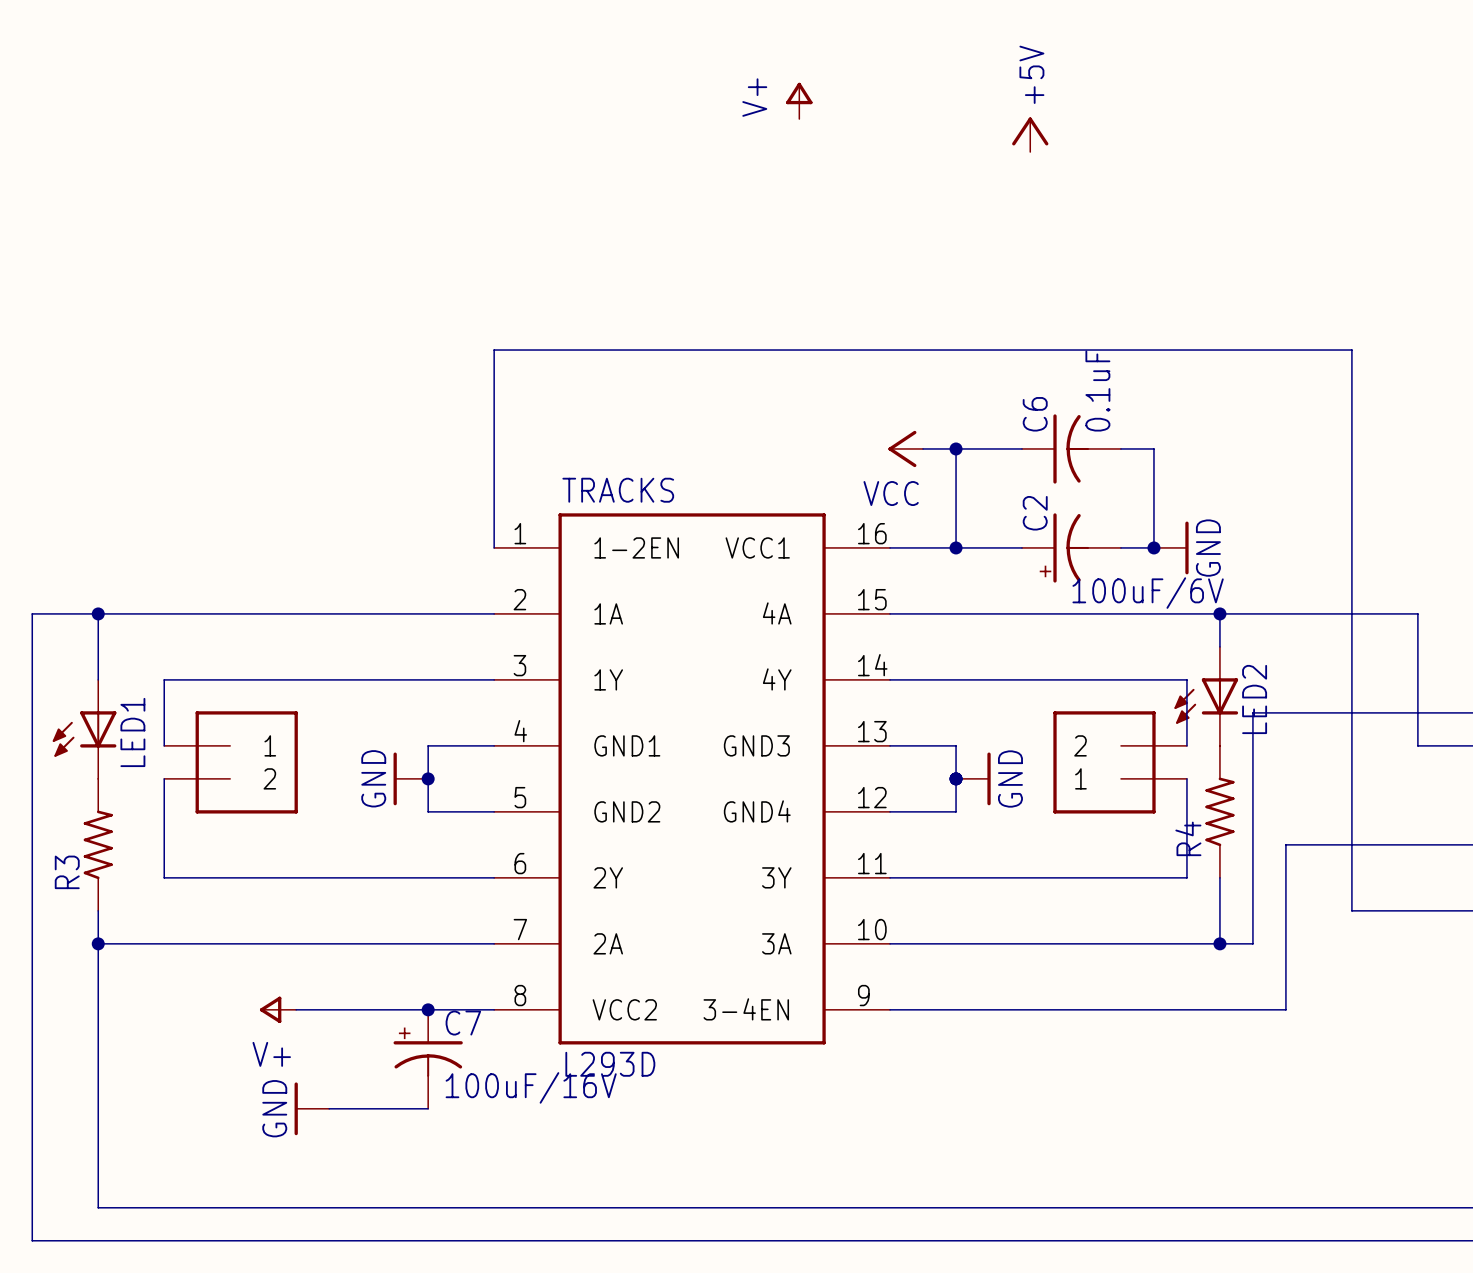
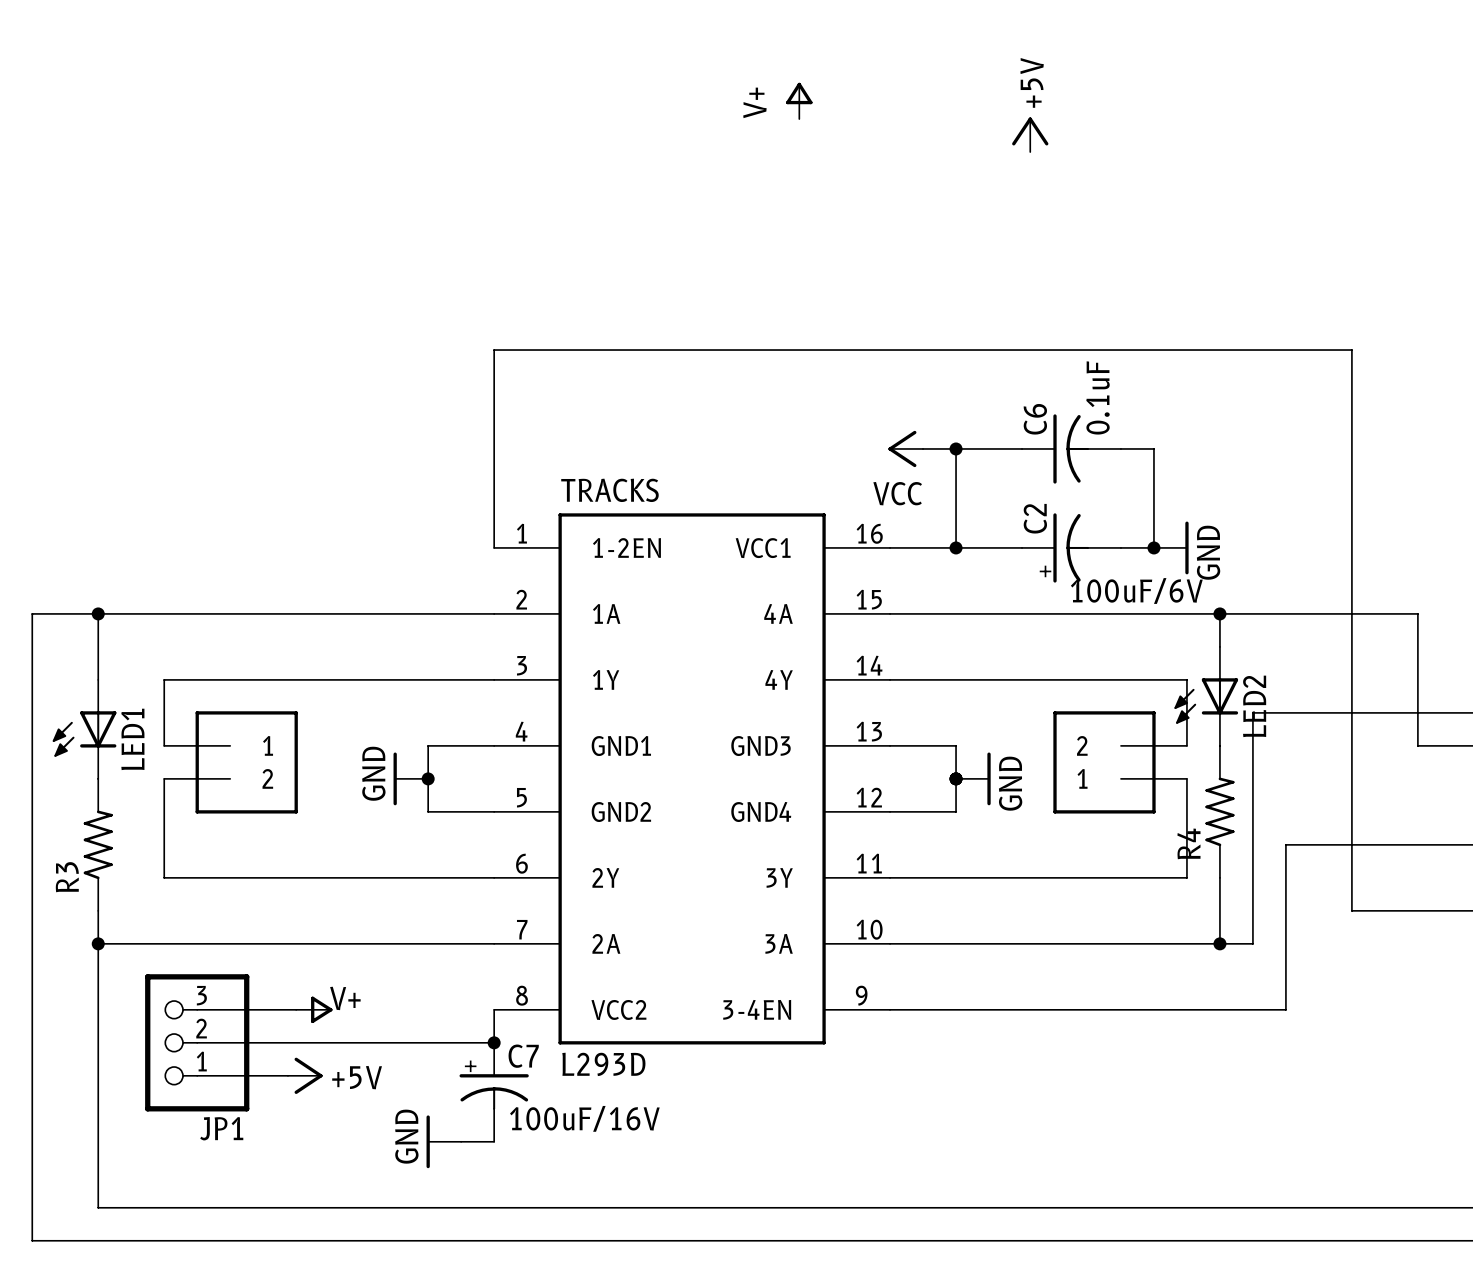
power symbol rotation: 0° (270, 1009) -> 180° (321, 1009)
power symbol position: V+ (278, 1009) -> V+ (314, 1009)
wire: (296, 1009) (494, 1009) -> (197, 1042) (494, 1042) (494, 1009)
junction position: (428, 1009) -> (494, 1042)
JP1: none -> (197, 1042)
power symbol text position: V+ (271, 1054) -> V+ (345, 998)
C7 position: (428, 1059) -> (494, 1092)
wire: none -> (197, 1075) (287, 1075)
power symbol: none -> +5V (305, 1075)
power symbol position: GND (311, 1108) -> GND (443, 1141)
wire: (329, 1108) (428, 1108) -> (197, 1009) (296, 1009)
wire: none -> (461, 1141) (494, 1141)

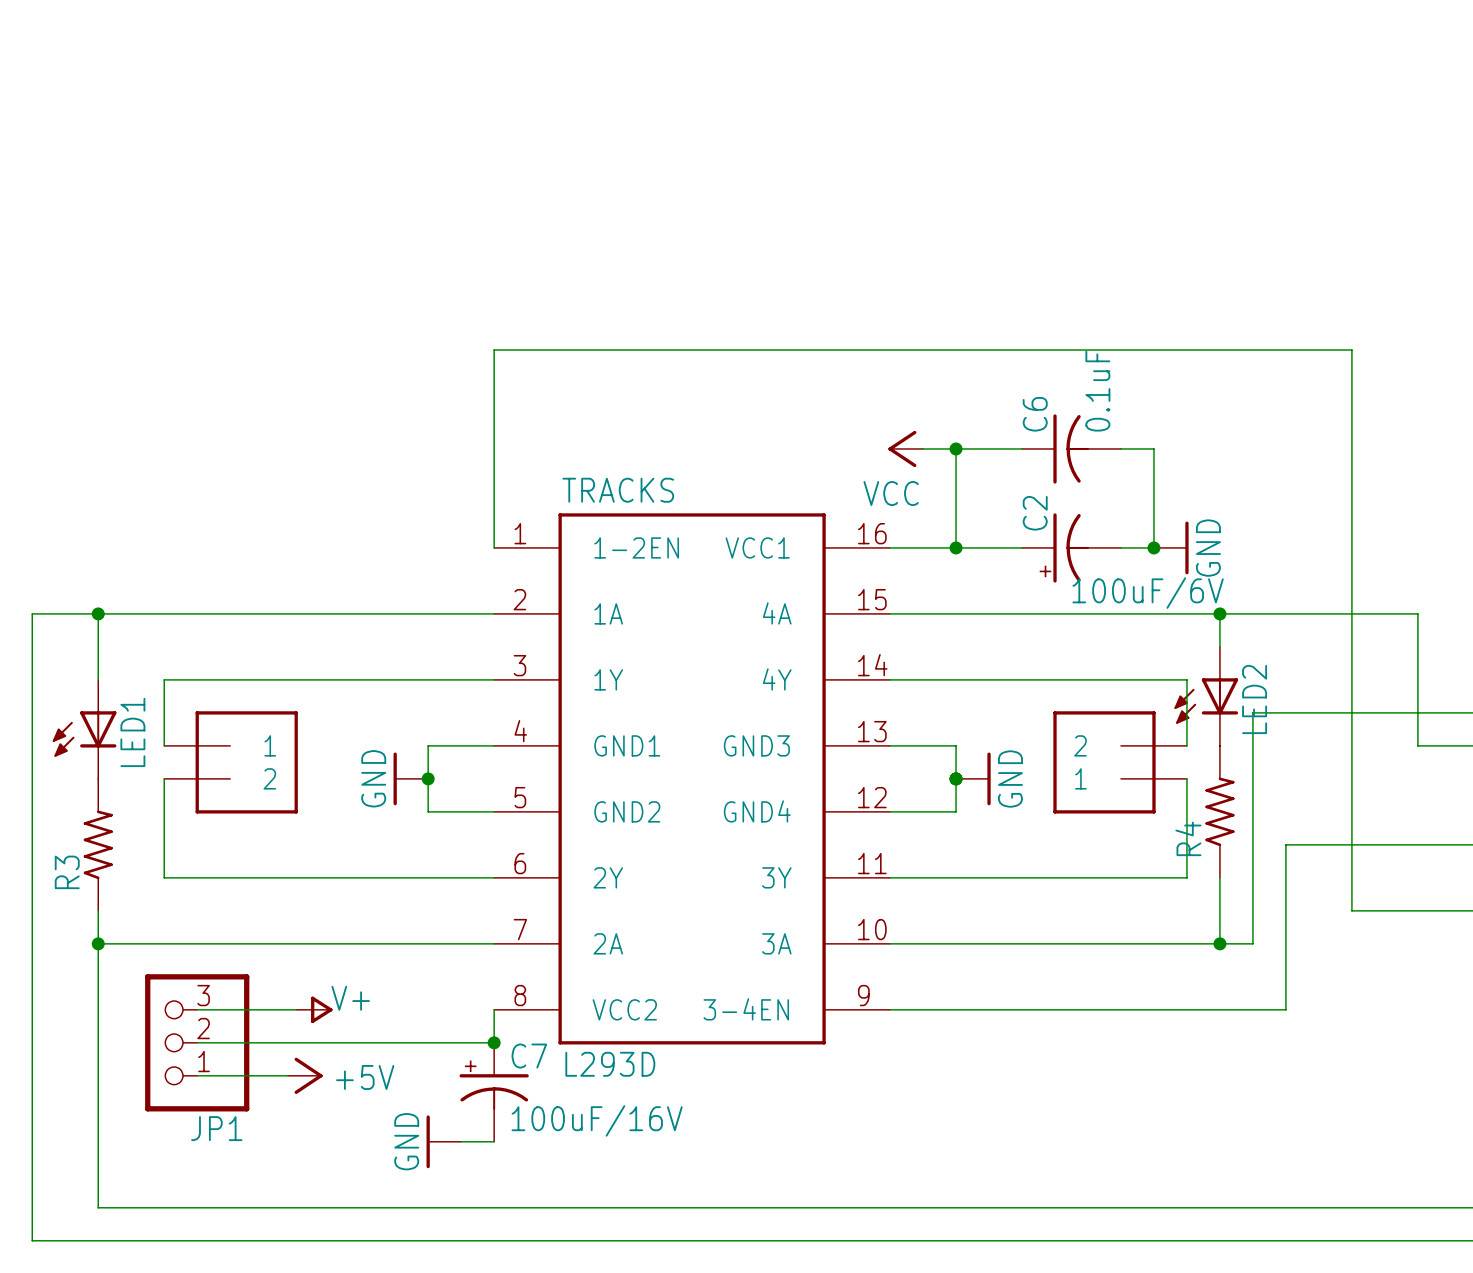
power symbol: V+ (799, 100) -> none
power symbol: +5V (1030, 134) -> none

